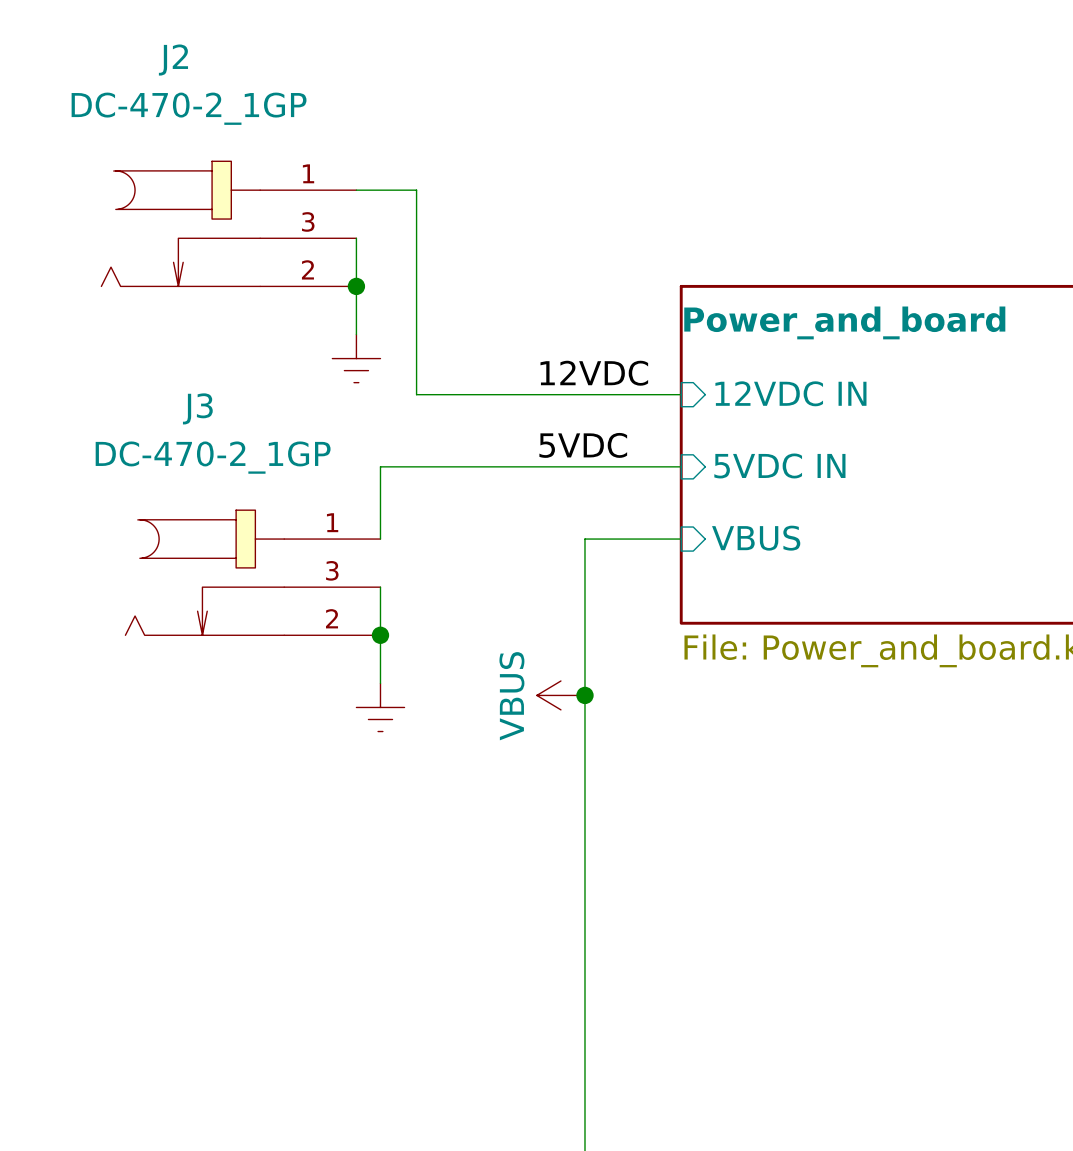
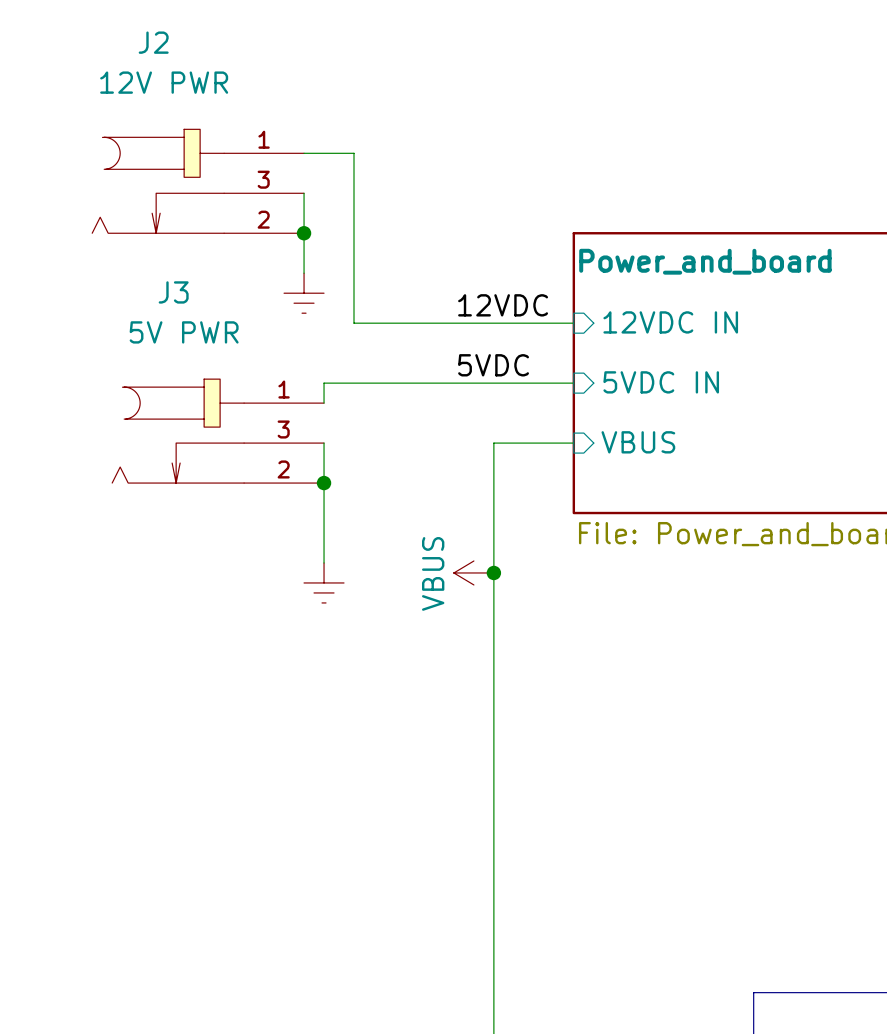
J2 value: DC-470-2_1GP (189, 108) -> 12V PWR (164, 82)
J3 value: DC-470-2_1GP (213, 457) -> 5V PWR (184, 332)
wire: (380, 490) (380, 539) -> (324, 483) (324, 443)
J3 position: (252, 572) -> (218, 431)
junction position: (380, 635) -> (324, 483)

